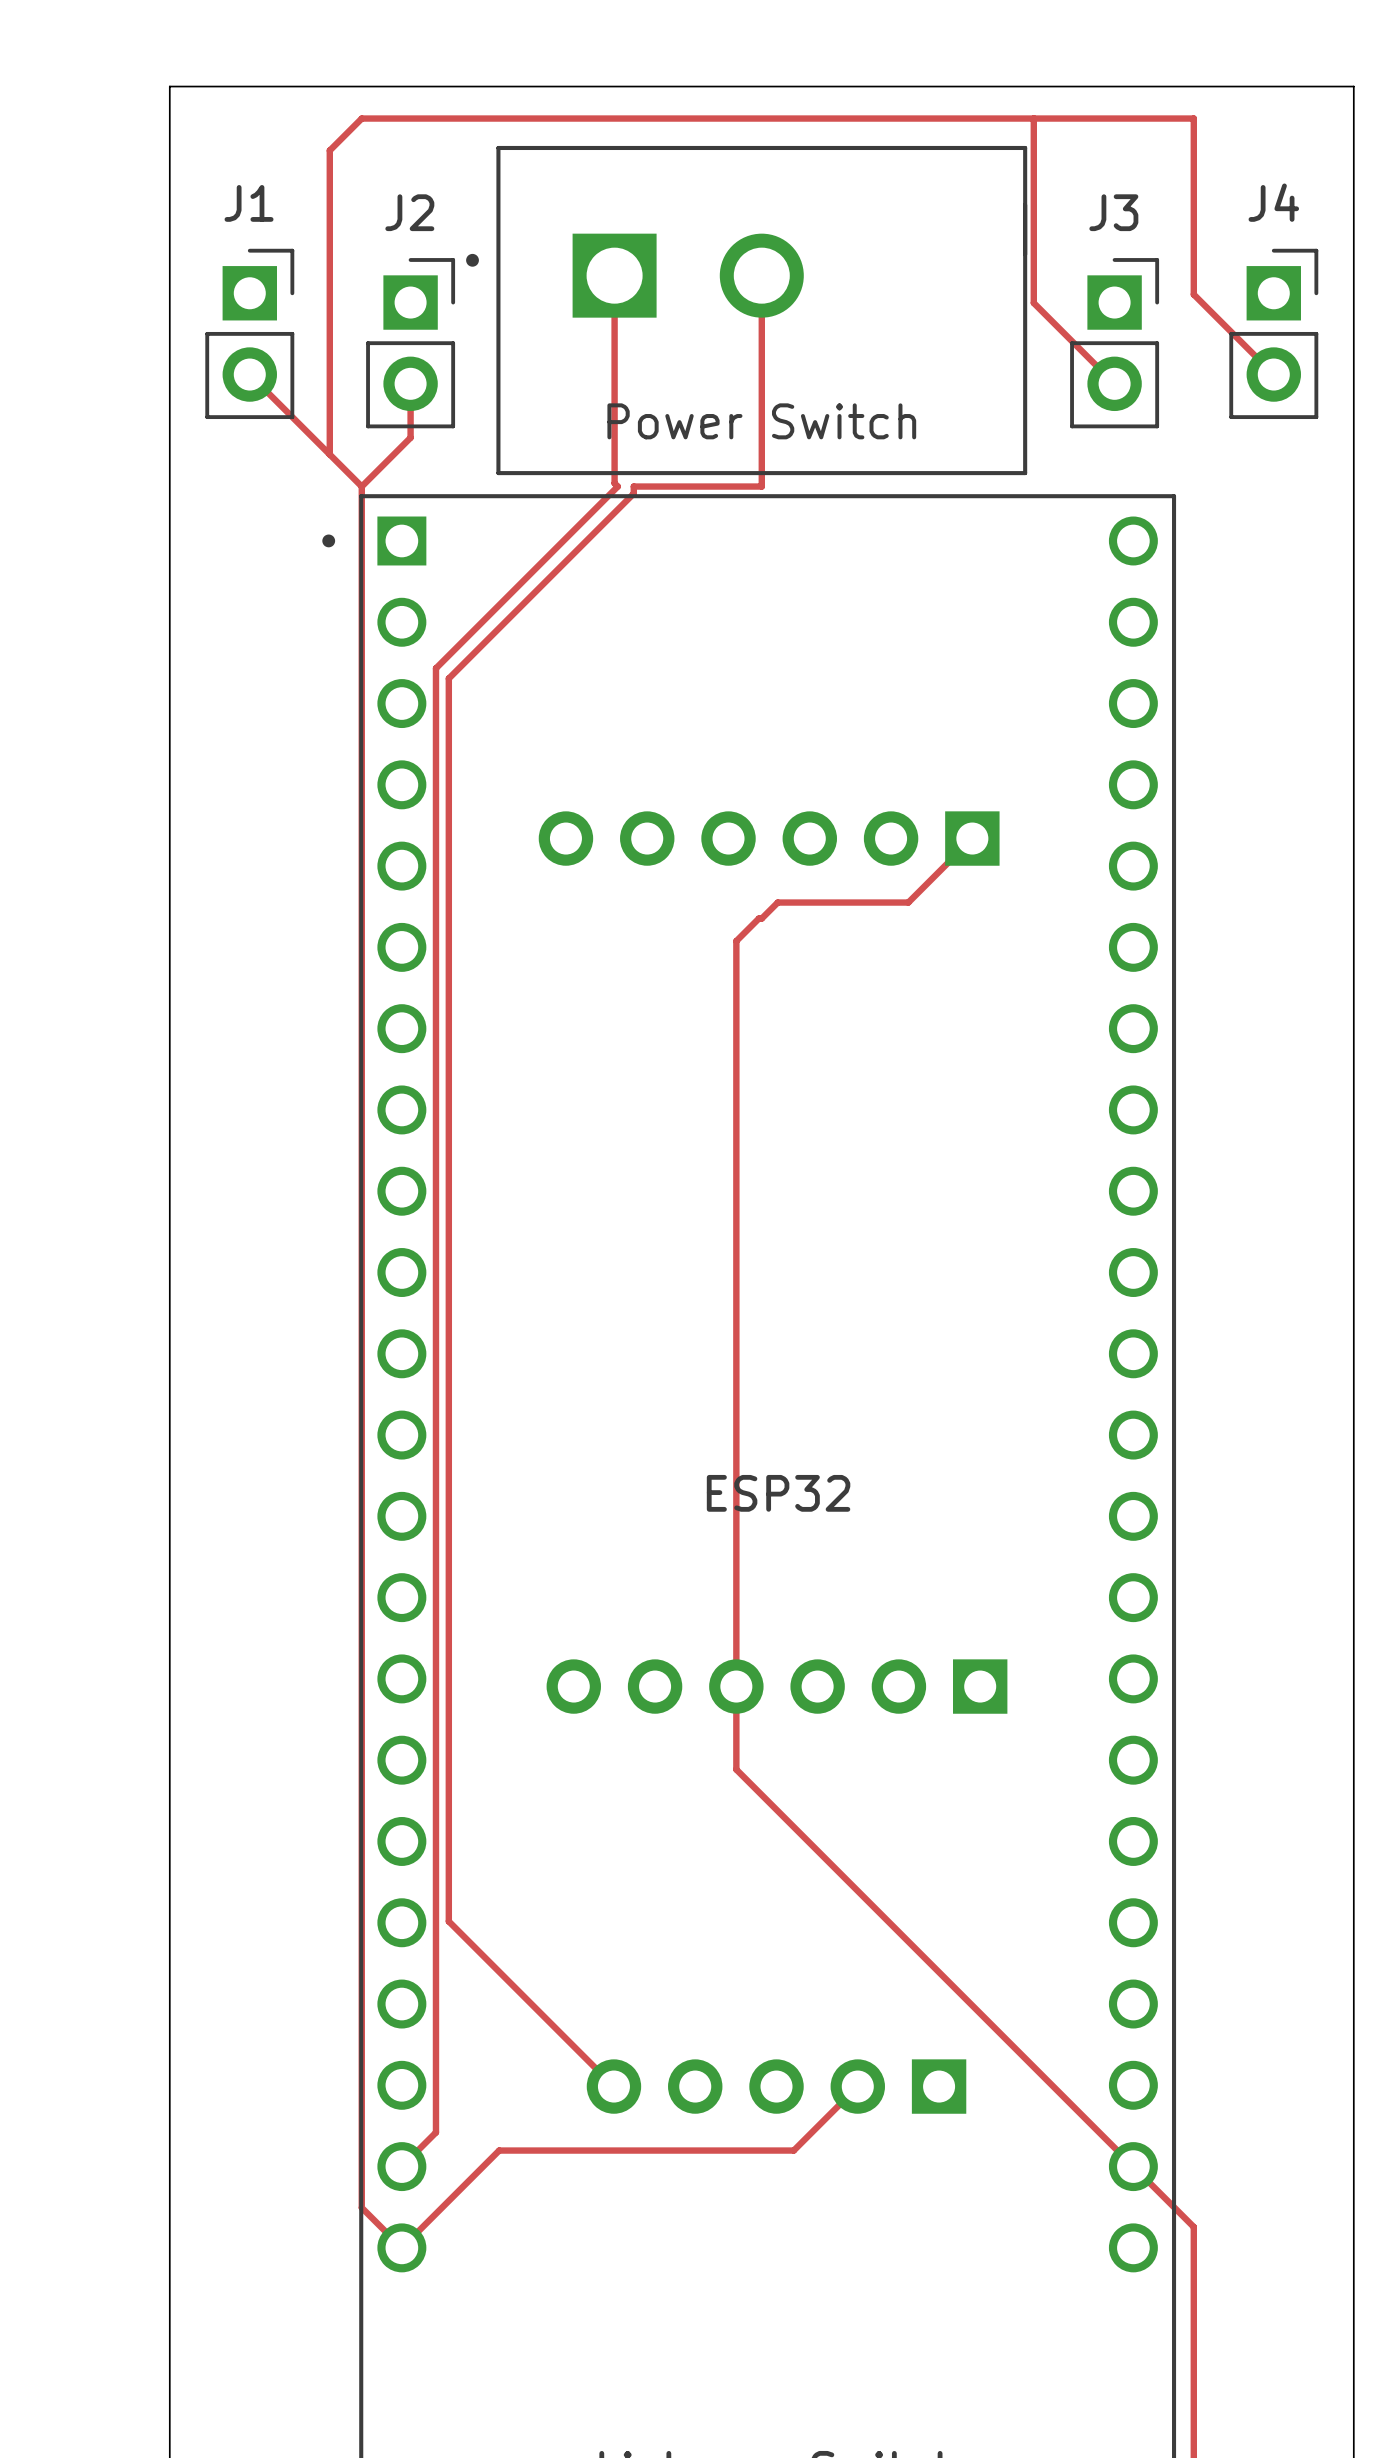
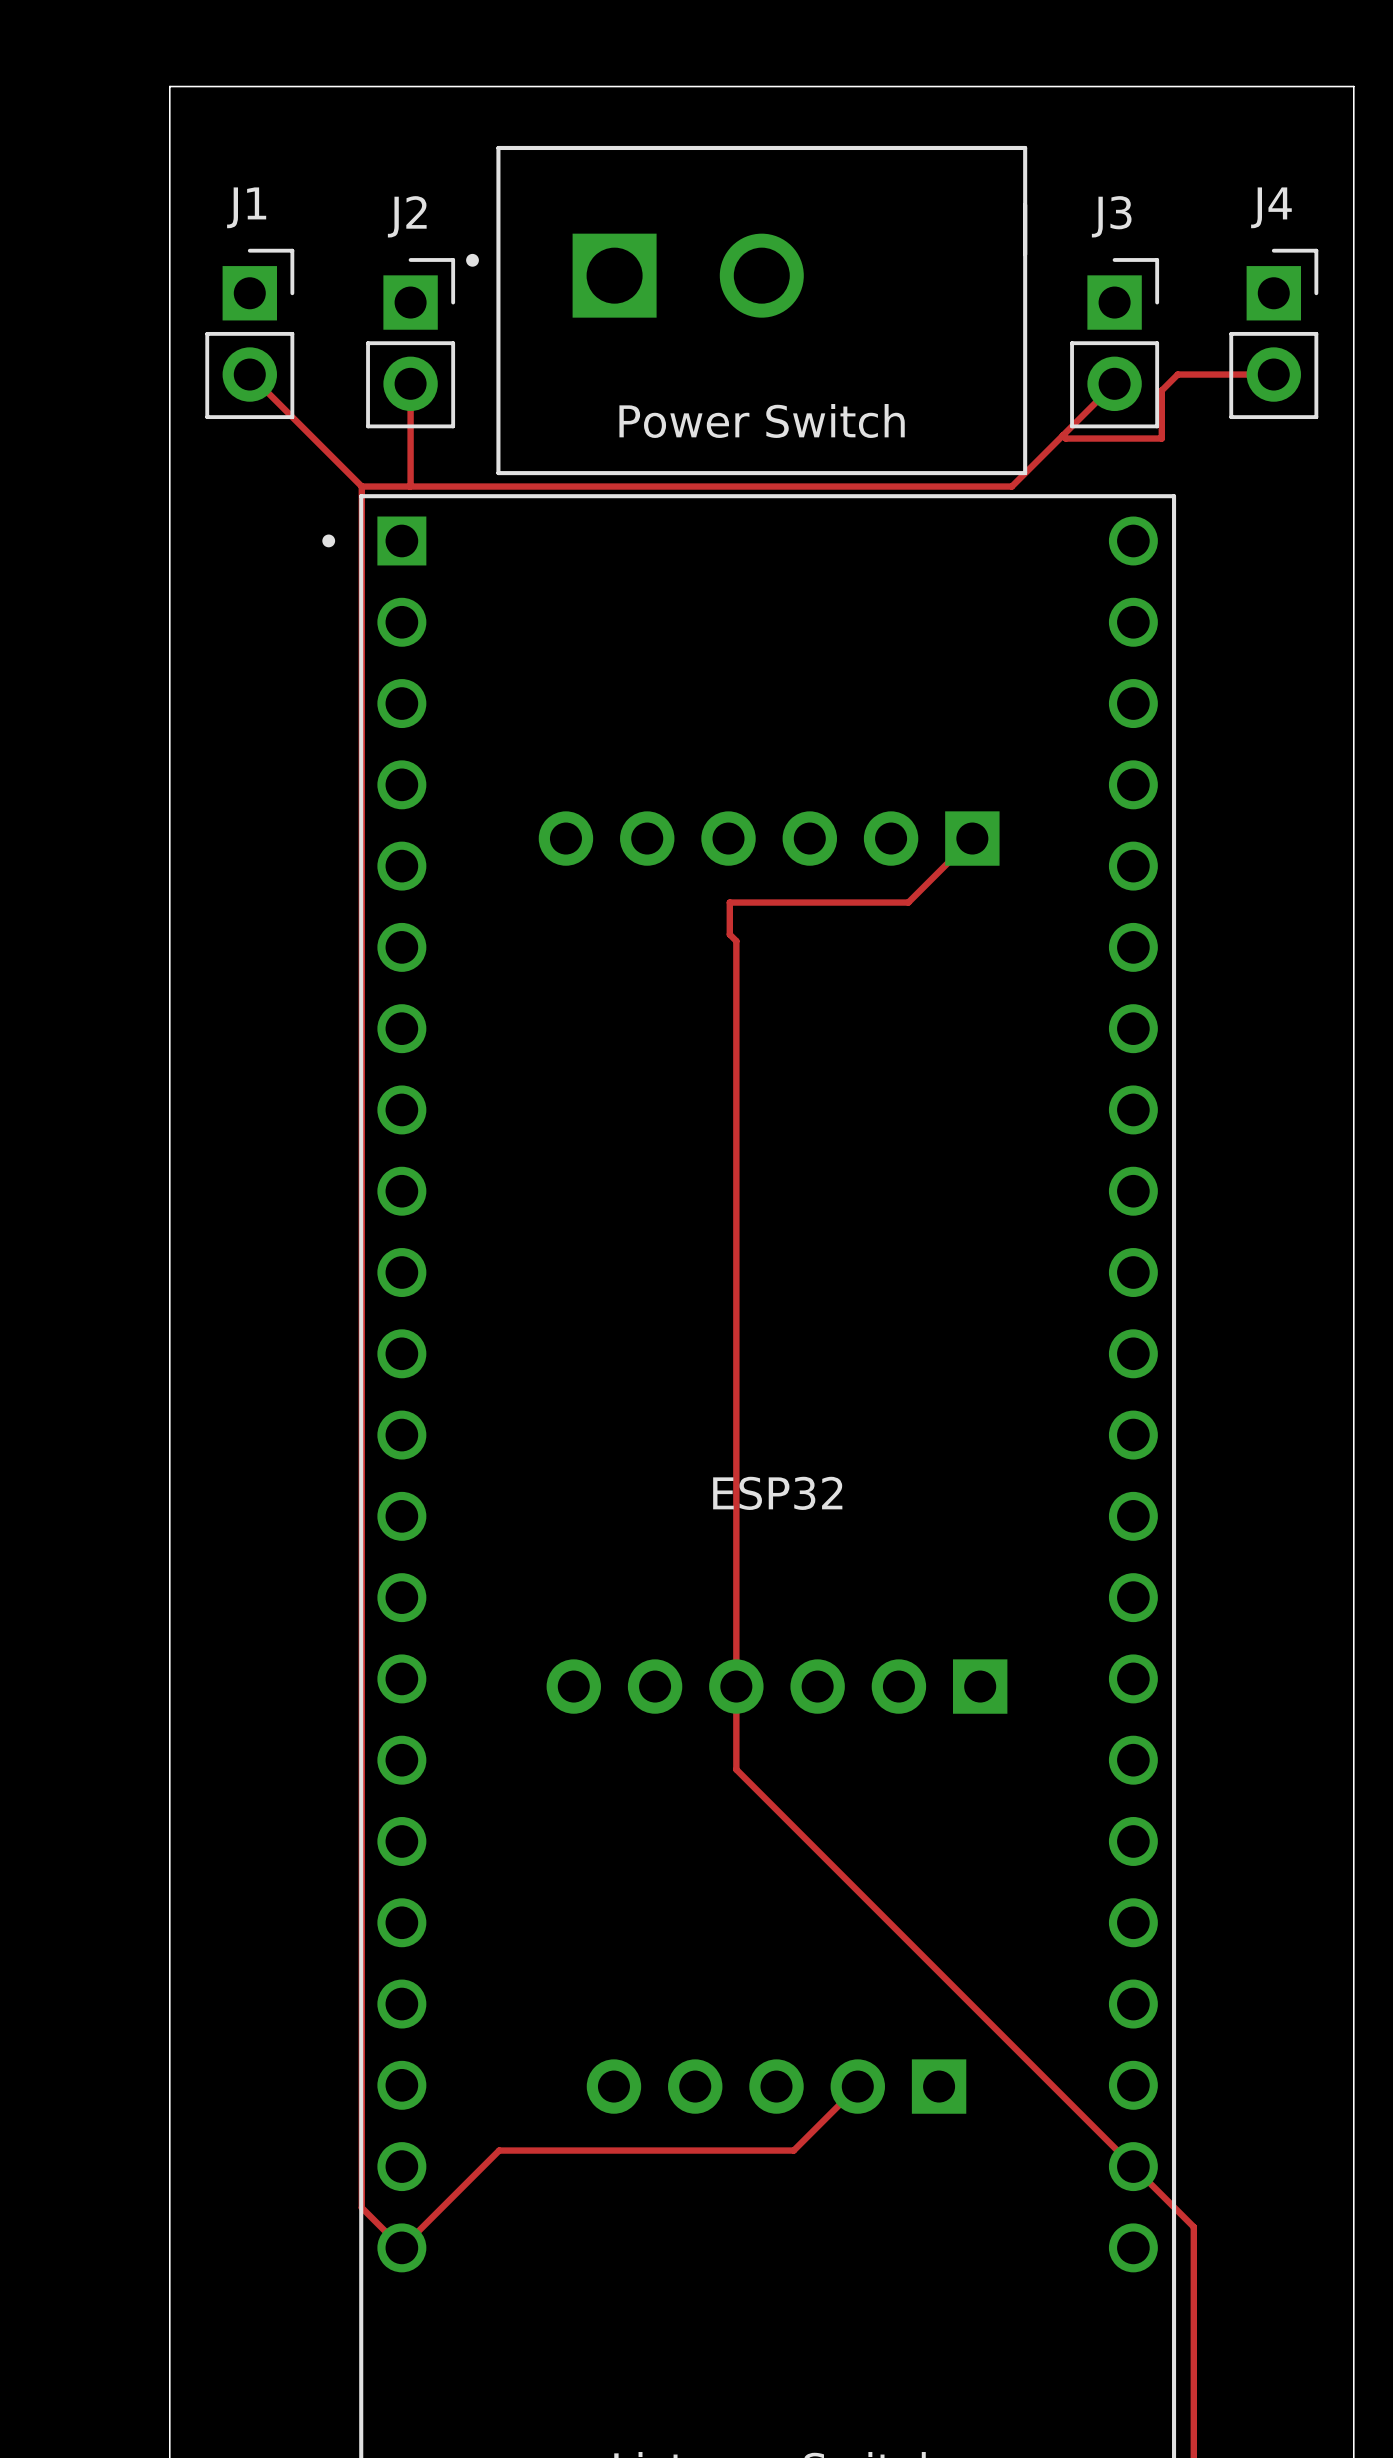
track: (1033, 118) (1033, 303) (1114, 383) (1114, 389) -> none
track: (614, 275) (614, 483) (617, 486) (435, 668) (435, 2132) (401, 2166) -> none
track: (761, 275) (761, 486) -> (1114, 383) (1011, 486) (761, 486)
track: (1273, 374) (1193, 294) (1193, 118) (361, 118) (329, 150) (329, 454) -> (1273, 374) (1177, 374) (1161, 390) (1161, 438) (1065, 438) (1062, 435)
track: (410, 437) (361, 486) -> (410, 437) (409, 486)
track: (633, 486) (633, 493) (448, 678) (448, 1921) (613, 2086) -> (633, 486) (361, 486)
track: (777, 902) (736, 941) -> (777, 902) (729, 902) (729, 934) (736, 941)

